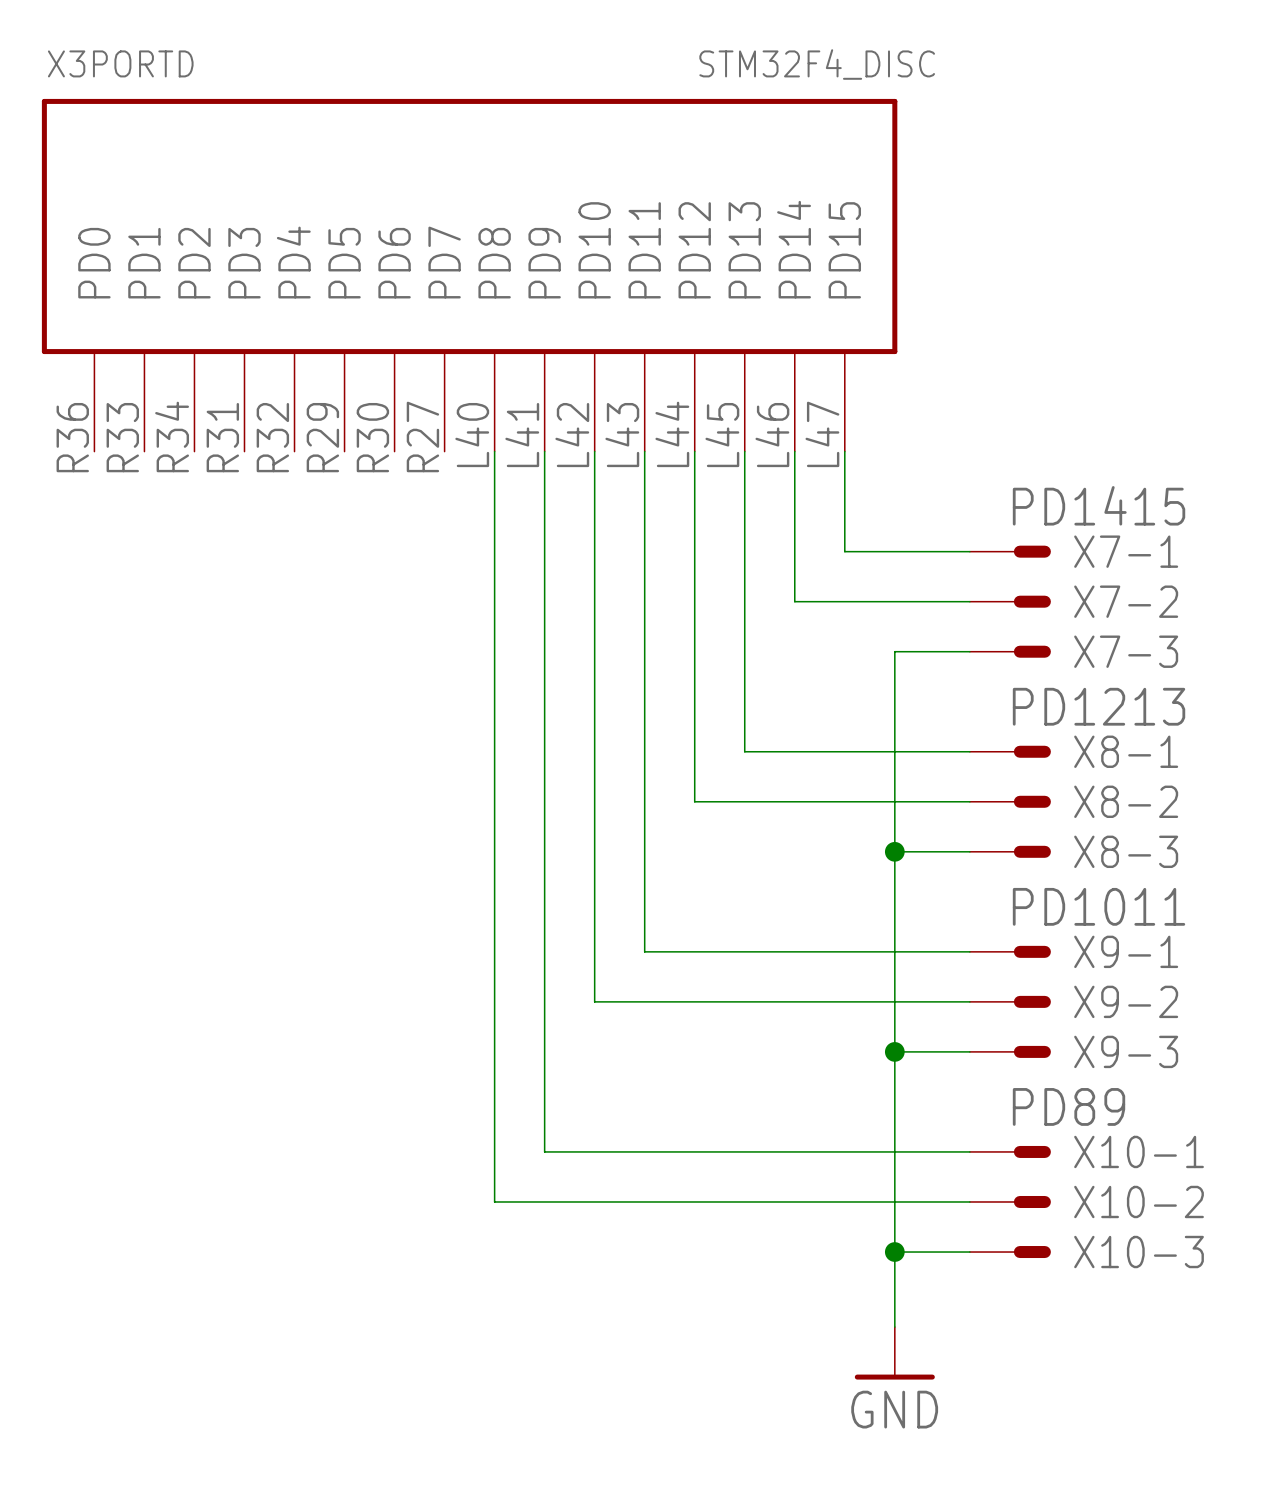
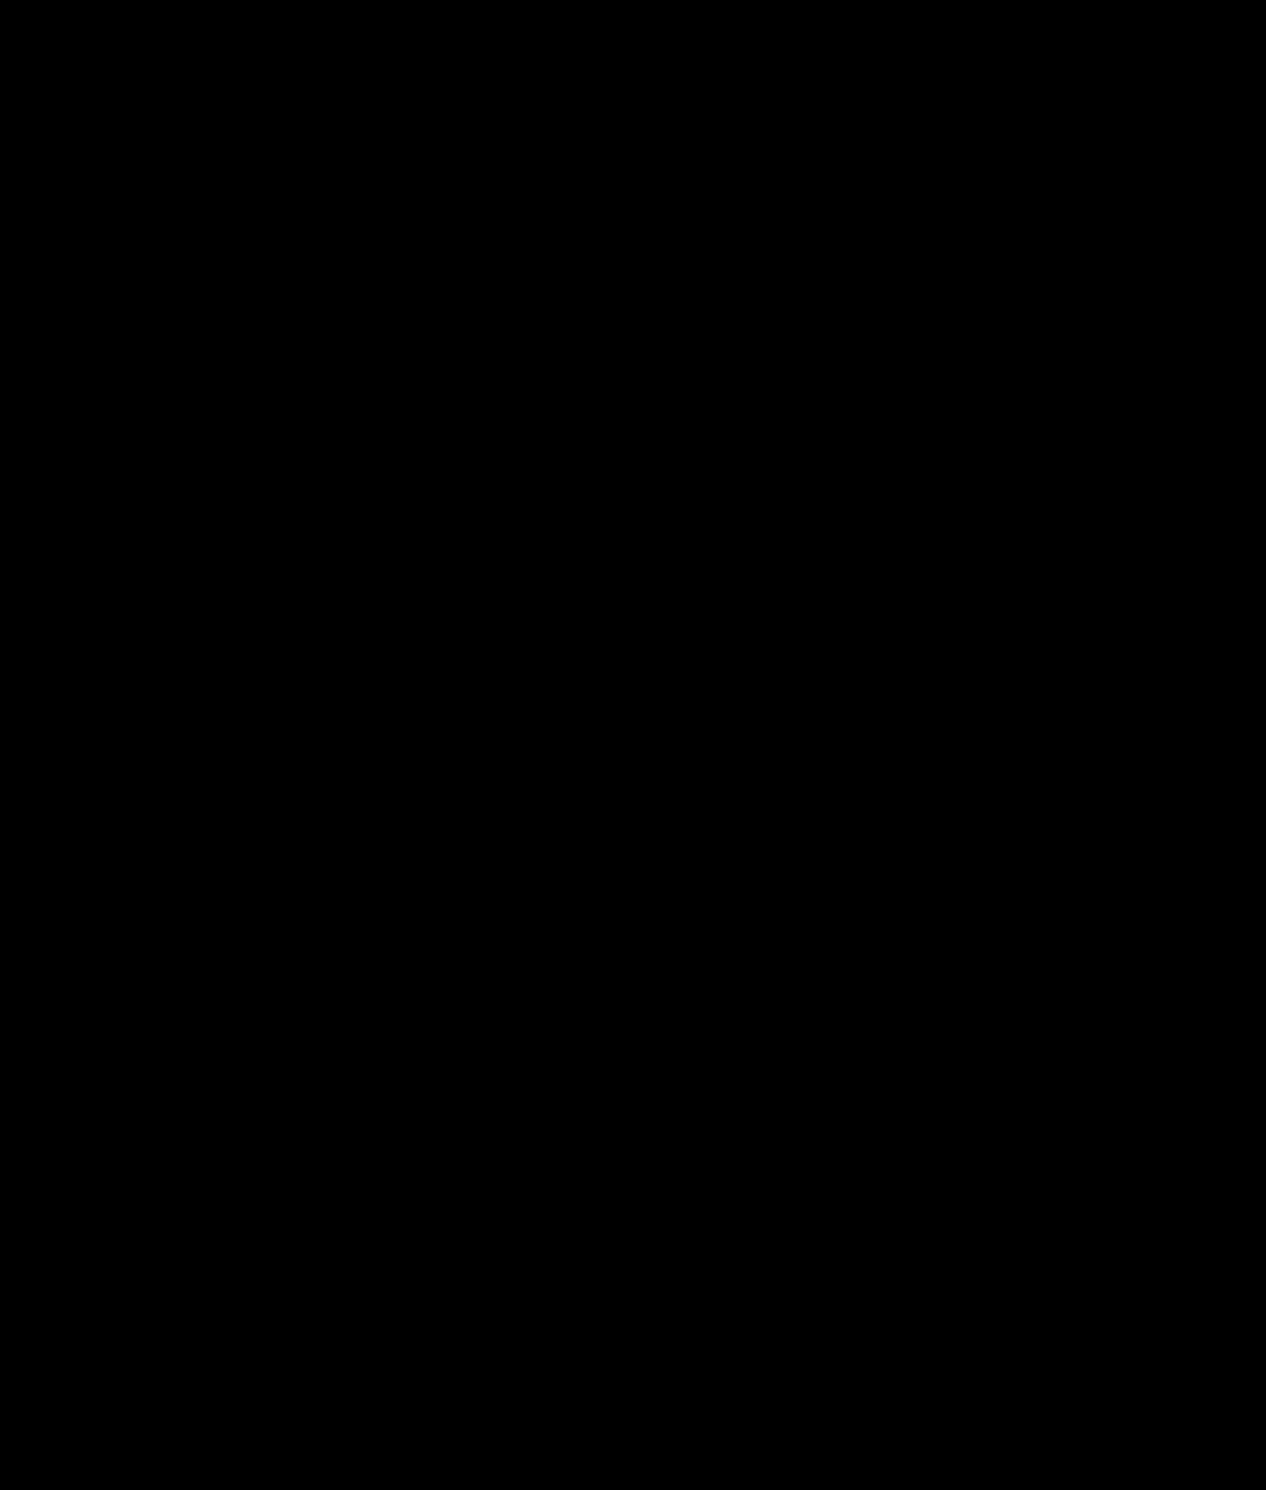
X3PORTD: STM32F4_DISC (469, 275) -> none
wire: (494, 451) (494, 1201) (969, 1201) -> none
wire: (544, 451) (544, 1151) (969, 1151) -> none
wire: (594, 451) (594, 1001) (969, 1001) -> none
wire: (644, 451) (644, 951) (969, 951) -> none
wire: (694, 451) (694, 801) (969, 801) -> none
wire: (744, 451) (744, 751) (969, 751) -> none
wire: (794, 451) (794, 601) (969, 601) -> none
wire: (844, 451) (844, 551) (969, 551) -> none
X7-1: PD1415 (1010, 551) -> none
X7-2: (1010, 601) -> none
wire: (969, 651) (894, 651) (894, 1327) -> none
X7-3: (1010, 651) -> none
X8-1: PD1213 (1010, 751) -> none
X8-2: (1010, 801) -> none
wire: (894, 851) (969, 851) -> none
junction: (894, 851) -> none
X8-3: (1010, 851) -> none
X9-1: PD1011 (1010, 951) -> none
X9-2: (1010, 1001) -> none
wire: (894, 1051) (969, 1051) -> none
junction: (894, 1051) -> none
X9-3: (1010, 1051) -> none
X10-1: PD89 (1010, 1151) -> none
X10-2: (1010, 1201) -> none
wire: (894, 1252) (969, 1252) -> none
junction: (894, 1252) -> none
X10-3: (1010, 1252) -> none
power symbol: GND (894, 1353) -> none

